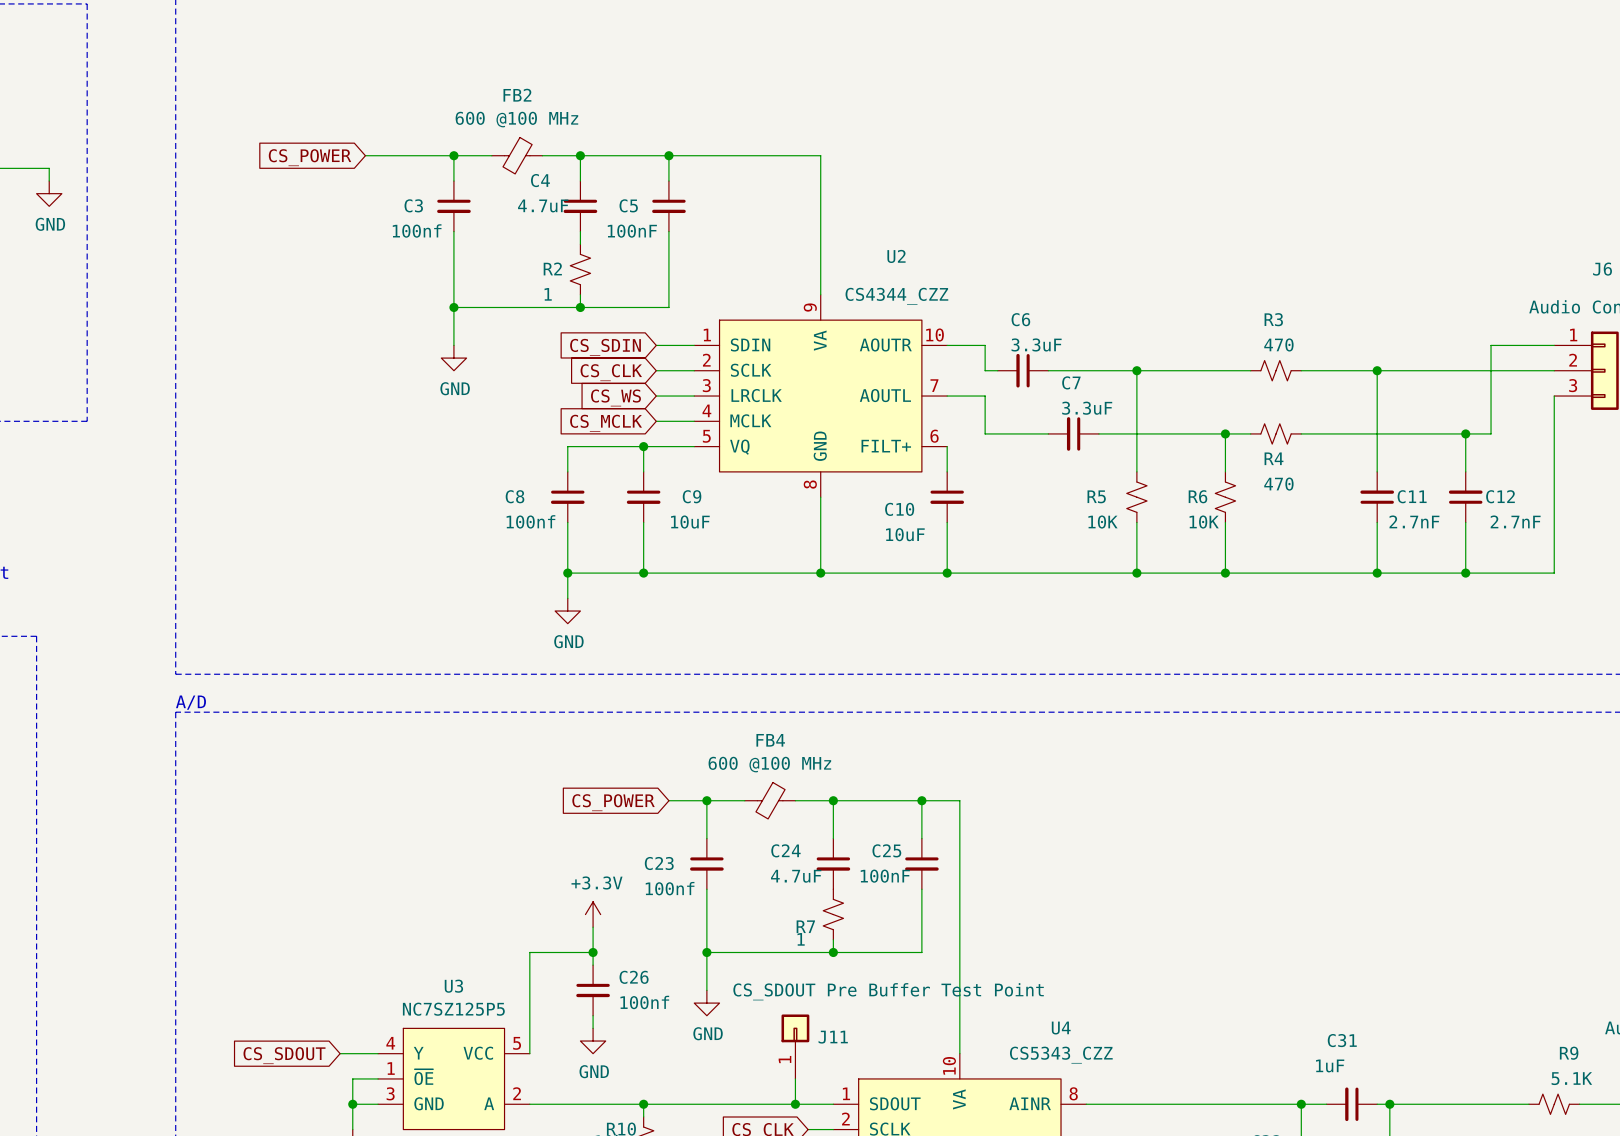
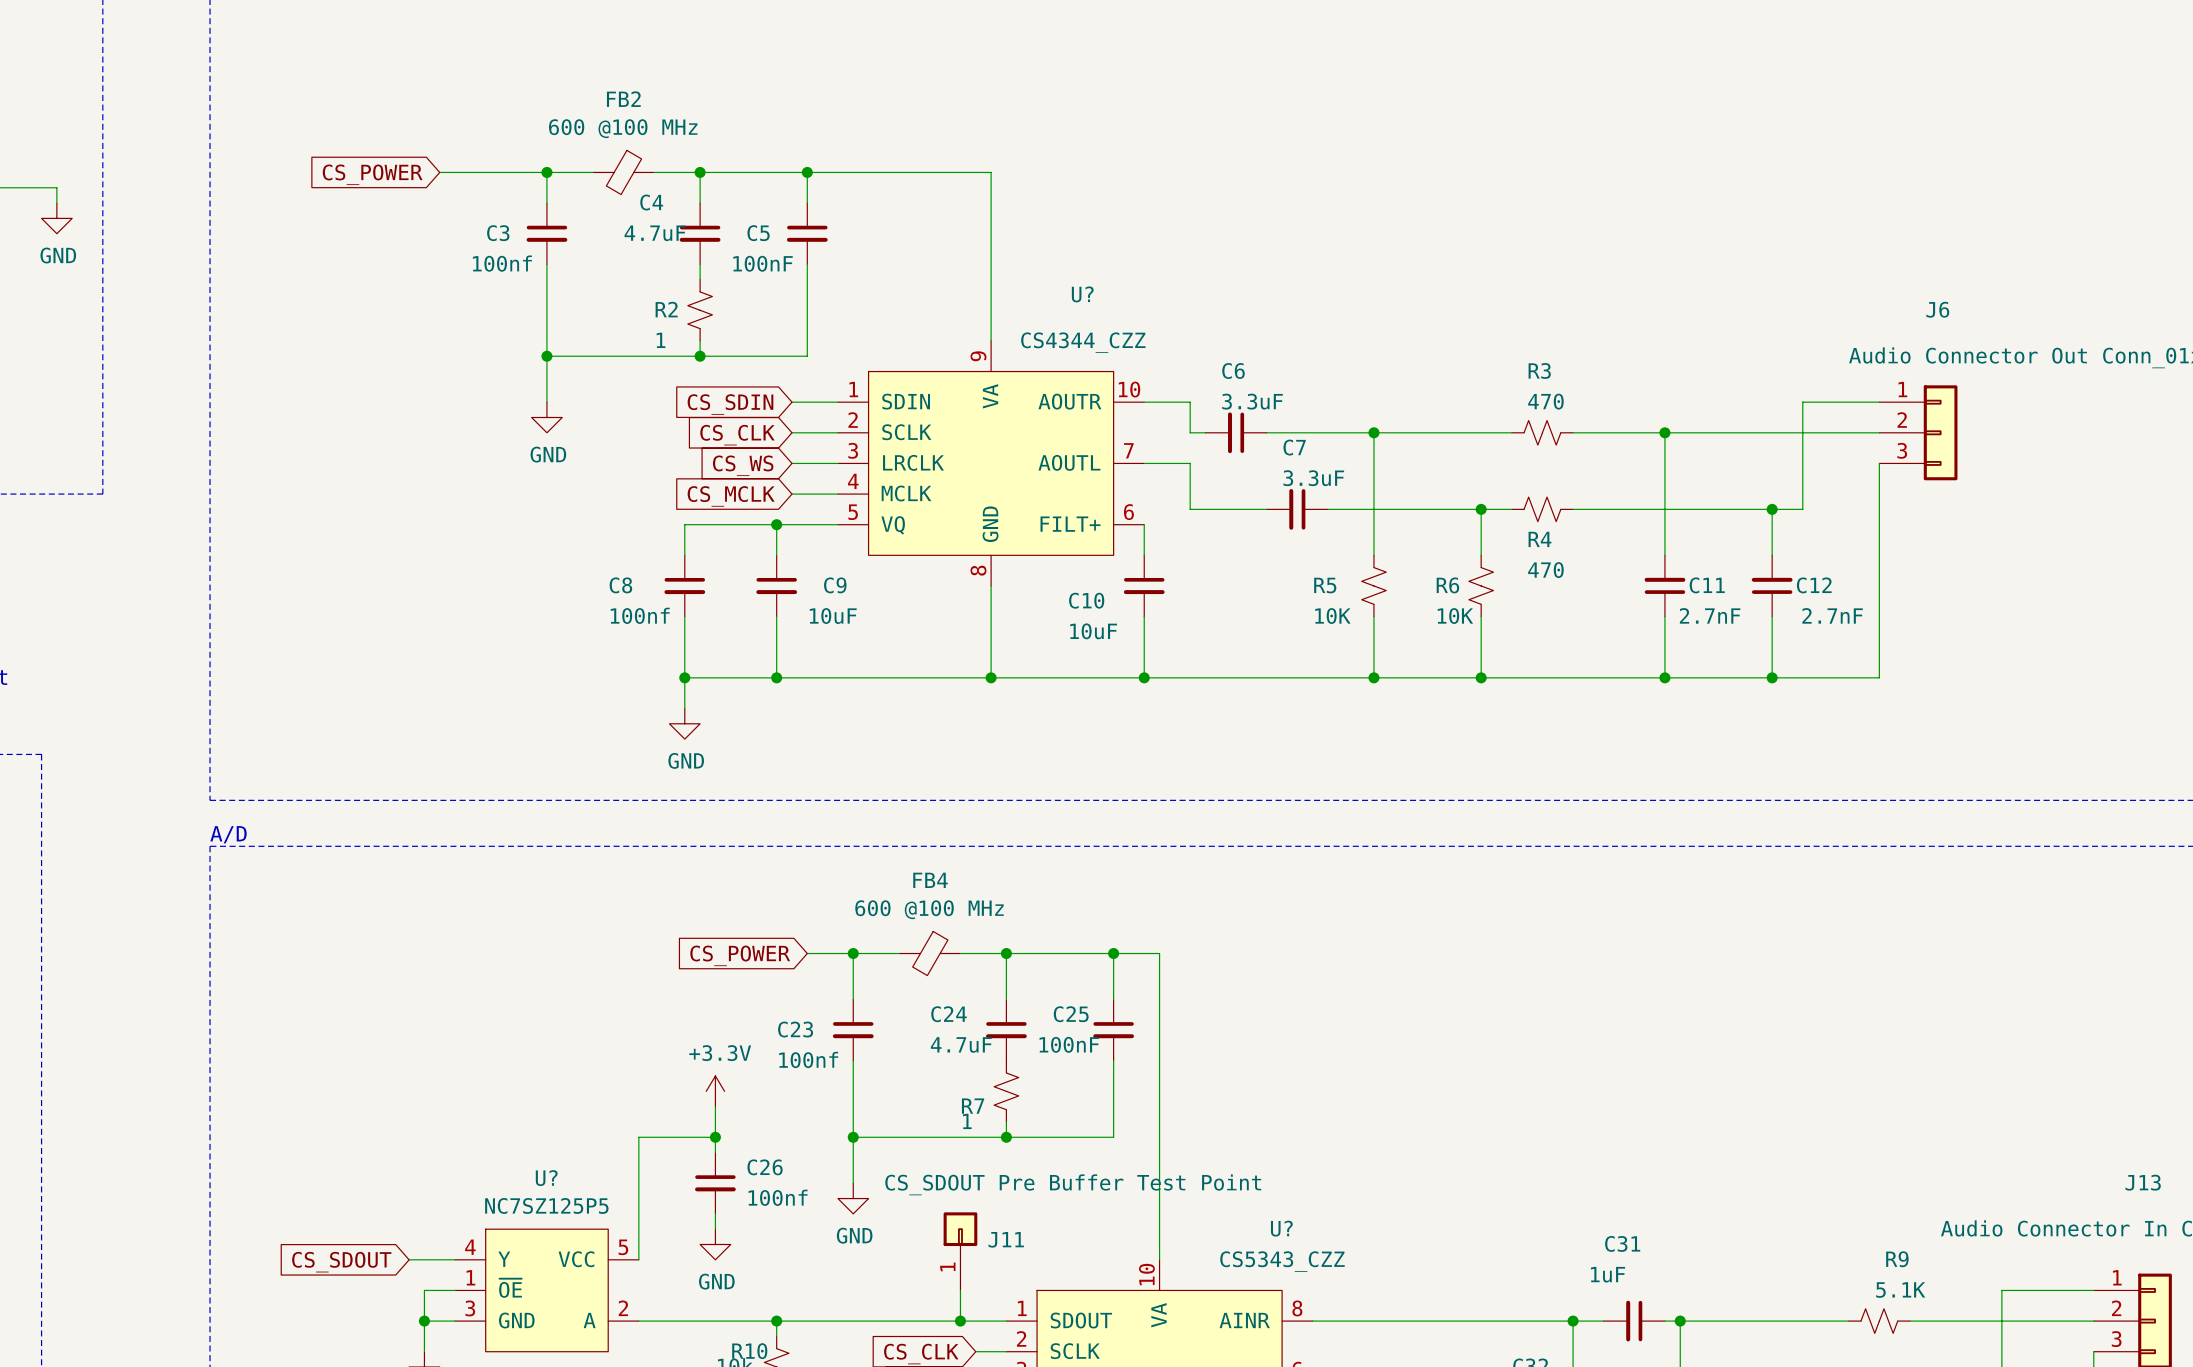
U2 name: U2 (896, 256) -> U? (1082, 294)
U3 name: U3 (453, 986) -> U? (546, 1178)
U4 name: U4 (1061, 1028) -> U? (1281, 1228)

